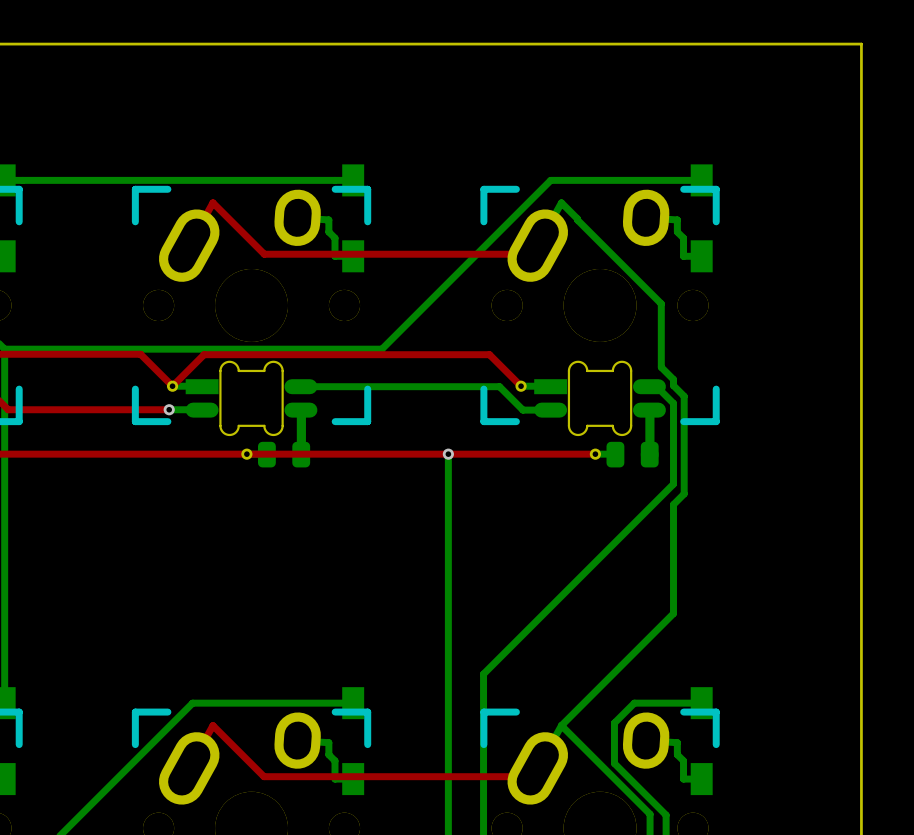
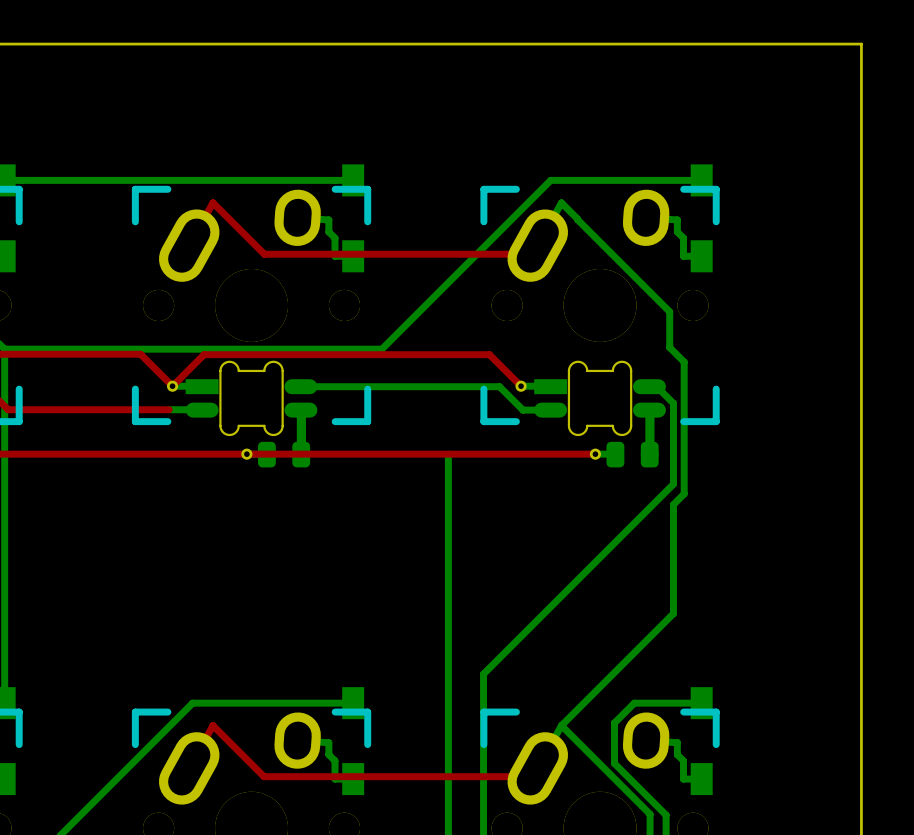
bottom track: (577, 219) (661, 303) (661, 367) (673, 379) (673, 385) (684, 396) -> (577, 219) (669, 311) (669, 347) (684, 362) (684, 396)
via: (169, 409) -> none
via: (448, 454) -> none

